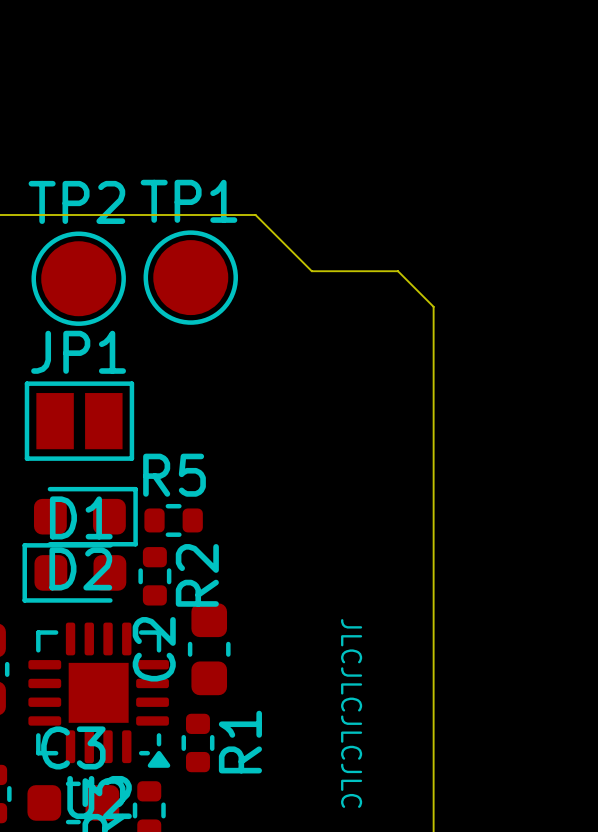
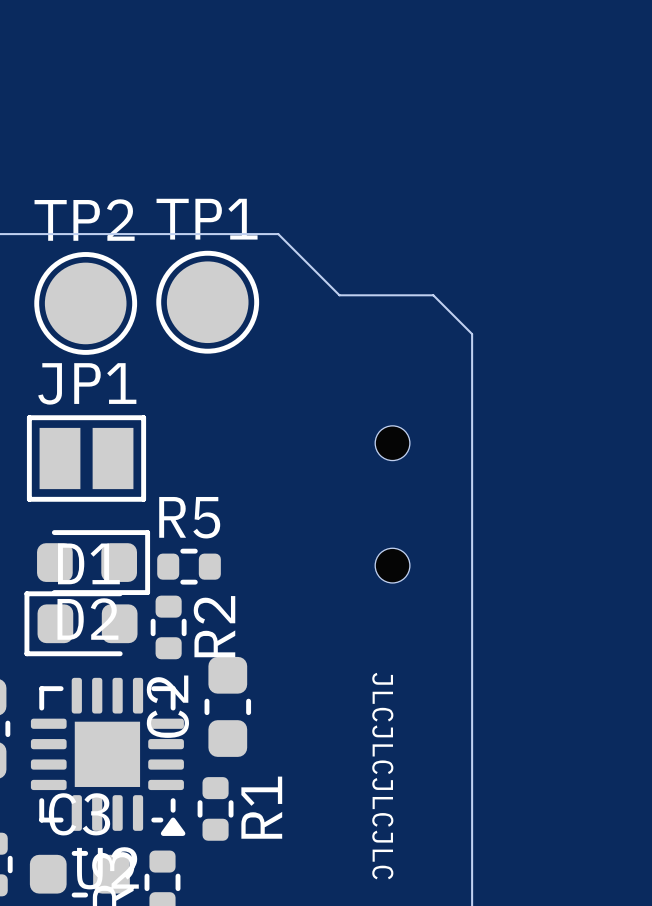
part: none -> (392, 504)

